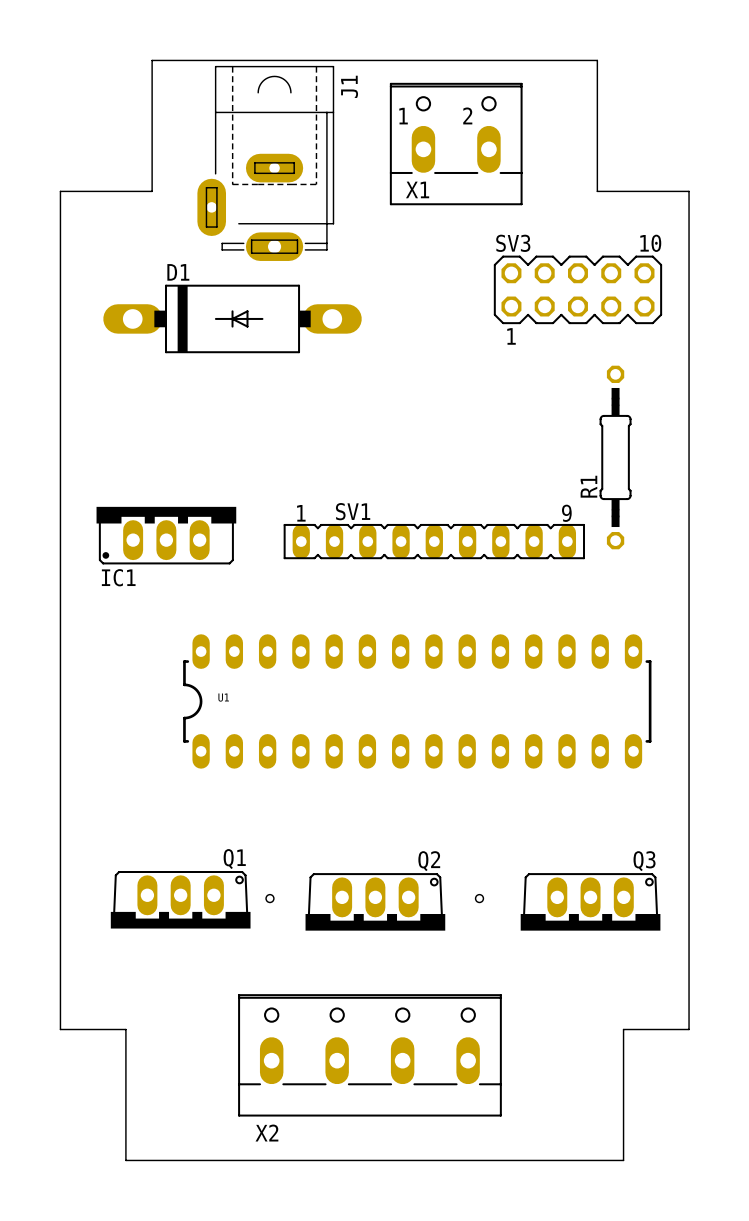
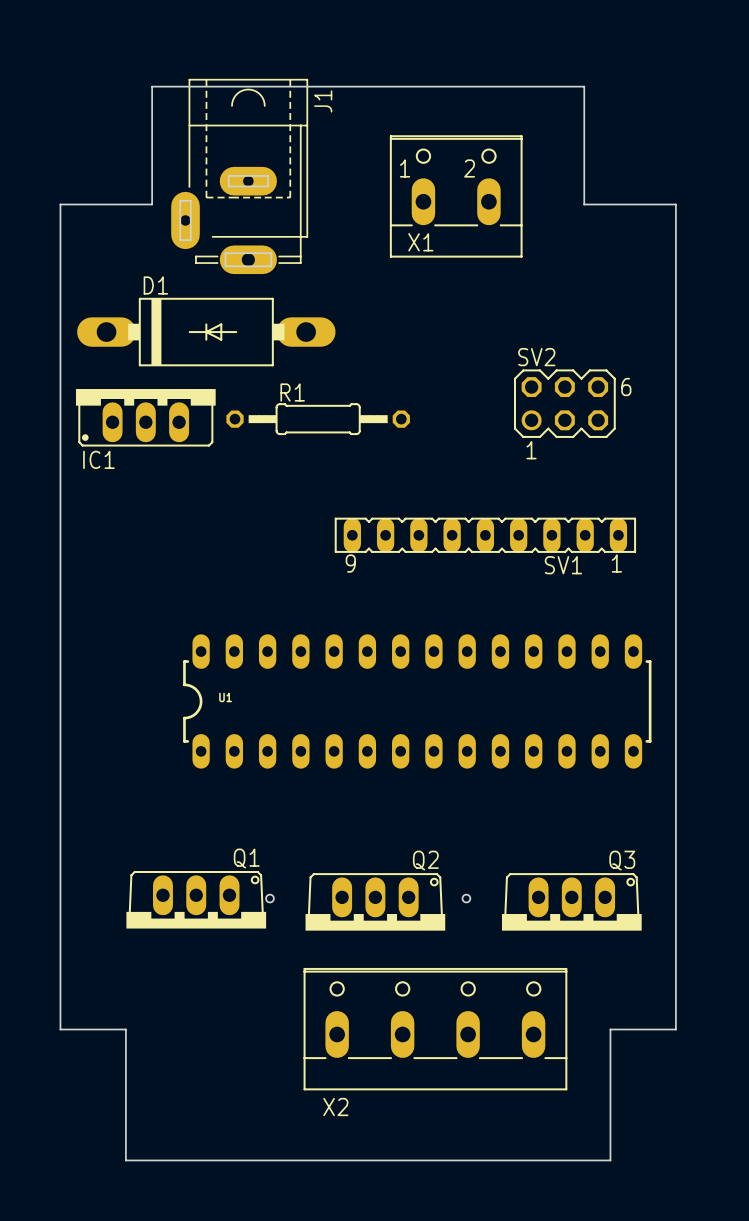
board edge: (152, 86) (152, 60) (597, 60) (597, 191) (689, 191) (689, 1029) (675, 1029) -> (152, 86) (584, 86) (584, 204) (675, 204) (675, 1029)
X1 position: (456, 144) -> (456, 196)
J1 position: (265, 163) -> (239, 176)
board edge: (152, 191) (60, 191) (60, 204) -> (152, 191) (152, 204) (60, 204)
SV3: (577, 289) -> none
D1 position: (232, 318) -> (206, 332)
SV2: none -> (564, 403)
R1 rotation: 0° (615, 457) -> 90° clockwise (318, 419)
R1 position: (615, 457) -> (318, 419)
SV1 name position: SV1 (353, 511) -> SV1 (563, 565)
SV1 text position: 1 (301, 513) -> 1 (616, 563)
SV1 text position: 9 (566, 513) -> 9 (350, 563)
IC1 position: (166, 535) -> (145, 417)
SV1 position: (434, 541) -> (485, 535)
hole position: (479, 898) -> (466, 898)
Q1 position: (180, 899) -> (196, 899)
Q3 position: (590, 901) -> (571, 901)
board edge: (623, 1029) (623, 1160) (610, 1160) -> (623, 1029) (610, 1029) (610, 1160)
X2 position: (369, 1055) -> (435, 1029)

